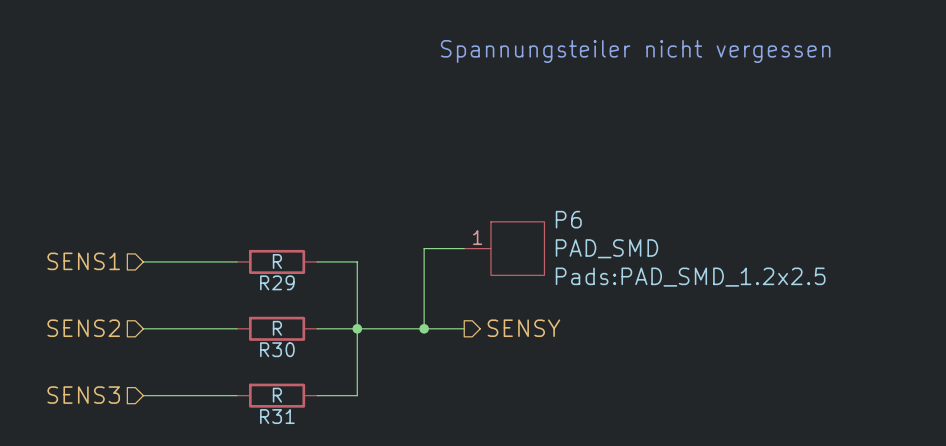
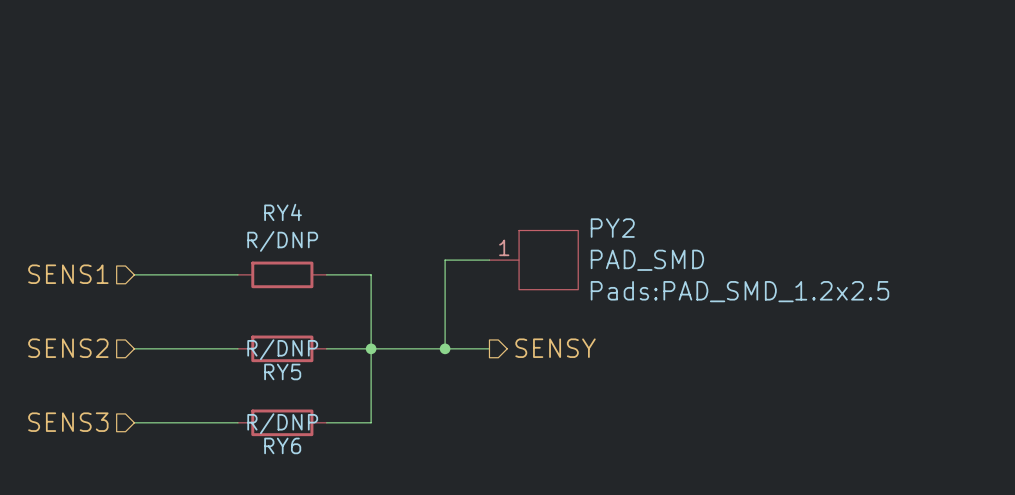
text: Spannungsteiler nicht vergessen (635, 51) -> none
P6 name: P6 (568, 219) -> PY2 (612, 228)
R29 value: R (277, 261) -> R/DNP (282, 241)
R29 name: R29 (277, 282) -> RY4 (283, 212)
R30 value: R (277, 328) -> R/DNP (282, 349)
R30 name: R30 (277, 349) -> RY5 (282, 371)
R31 value: R (277, 395) -> R/DNP (282, 423)
R31 name: R31 (277, 416) -> RY6 (282, 445)

